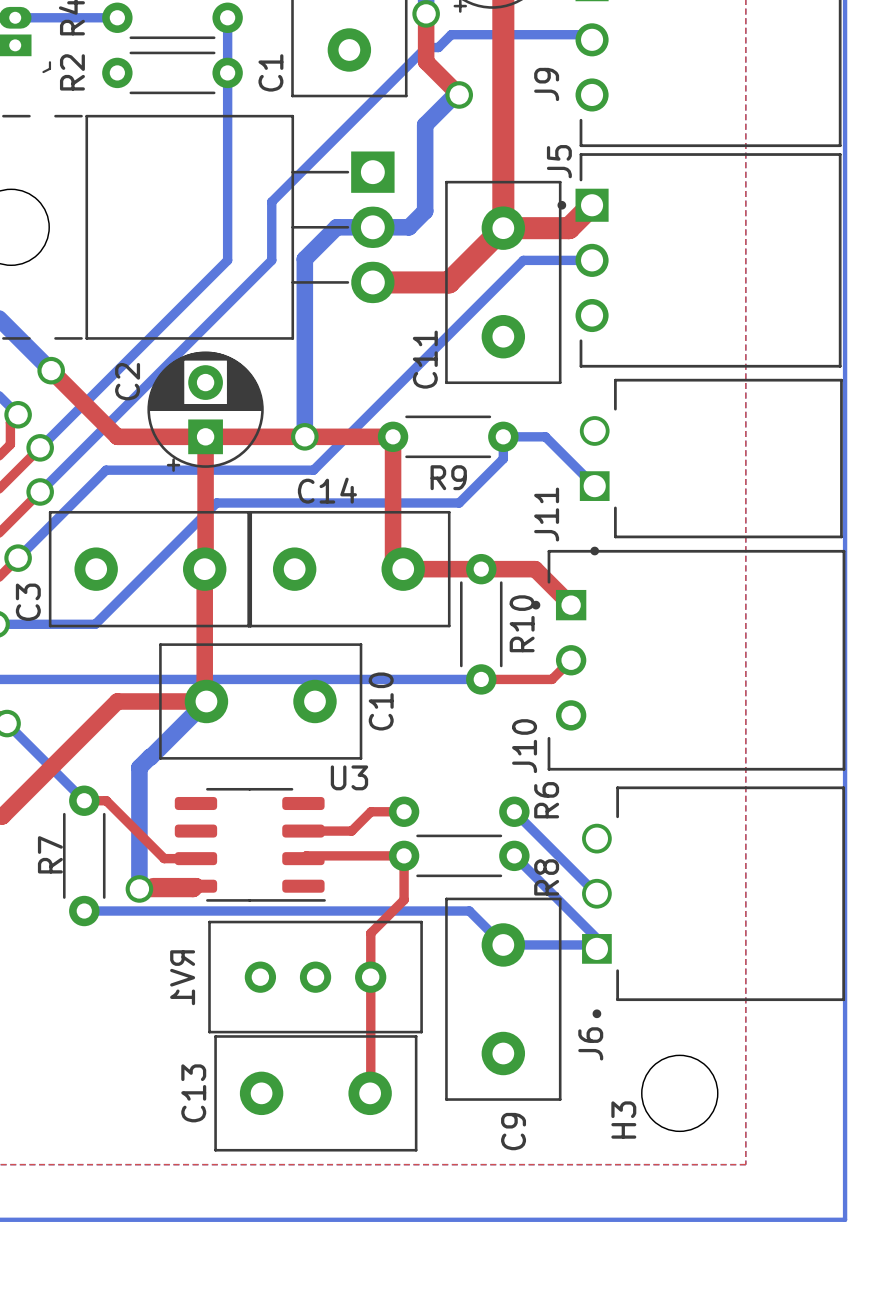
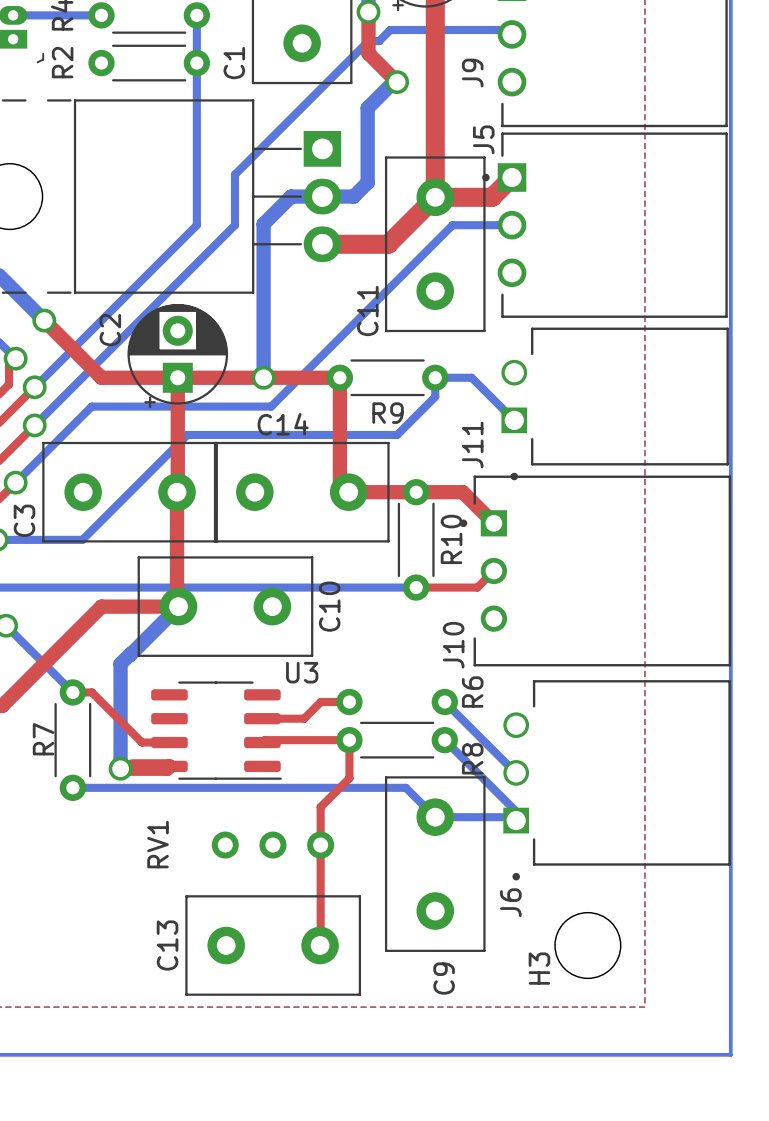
RV1 side: top (315, 977) -> bottom (272, 845)

